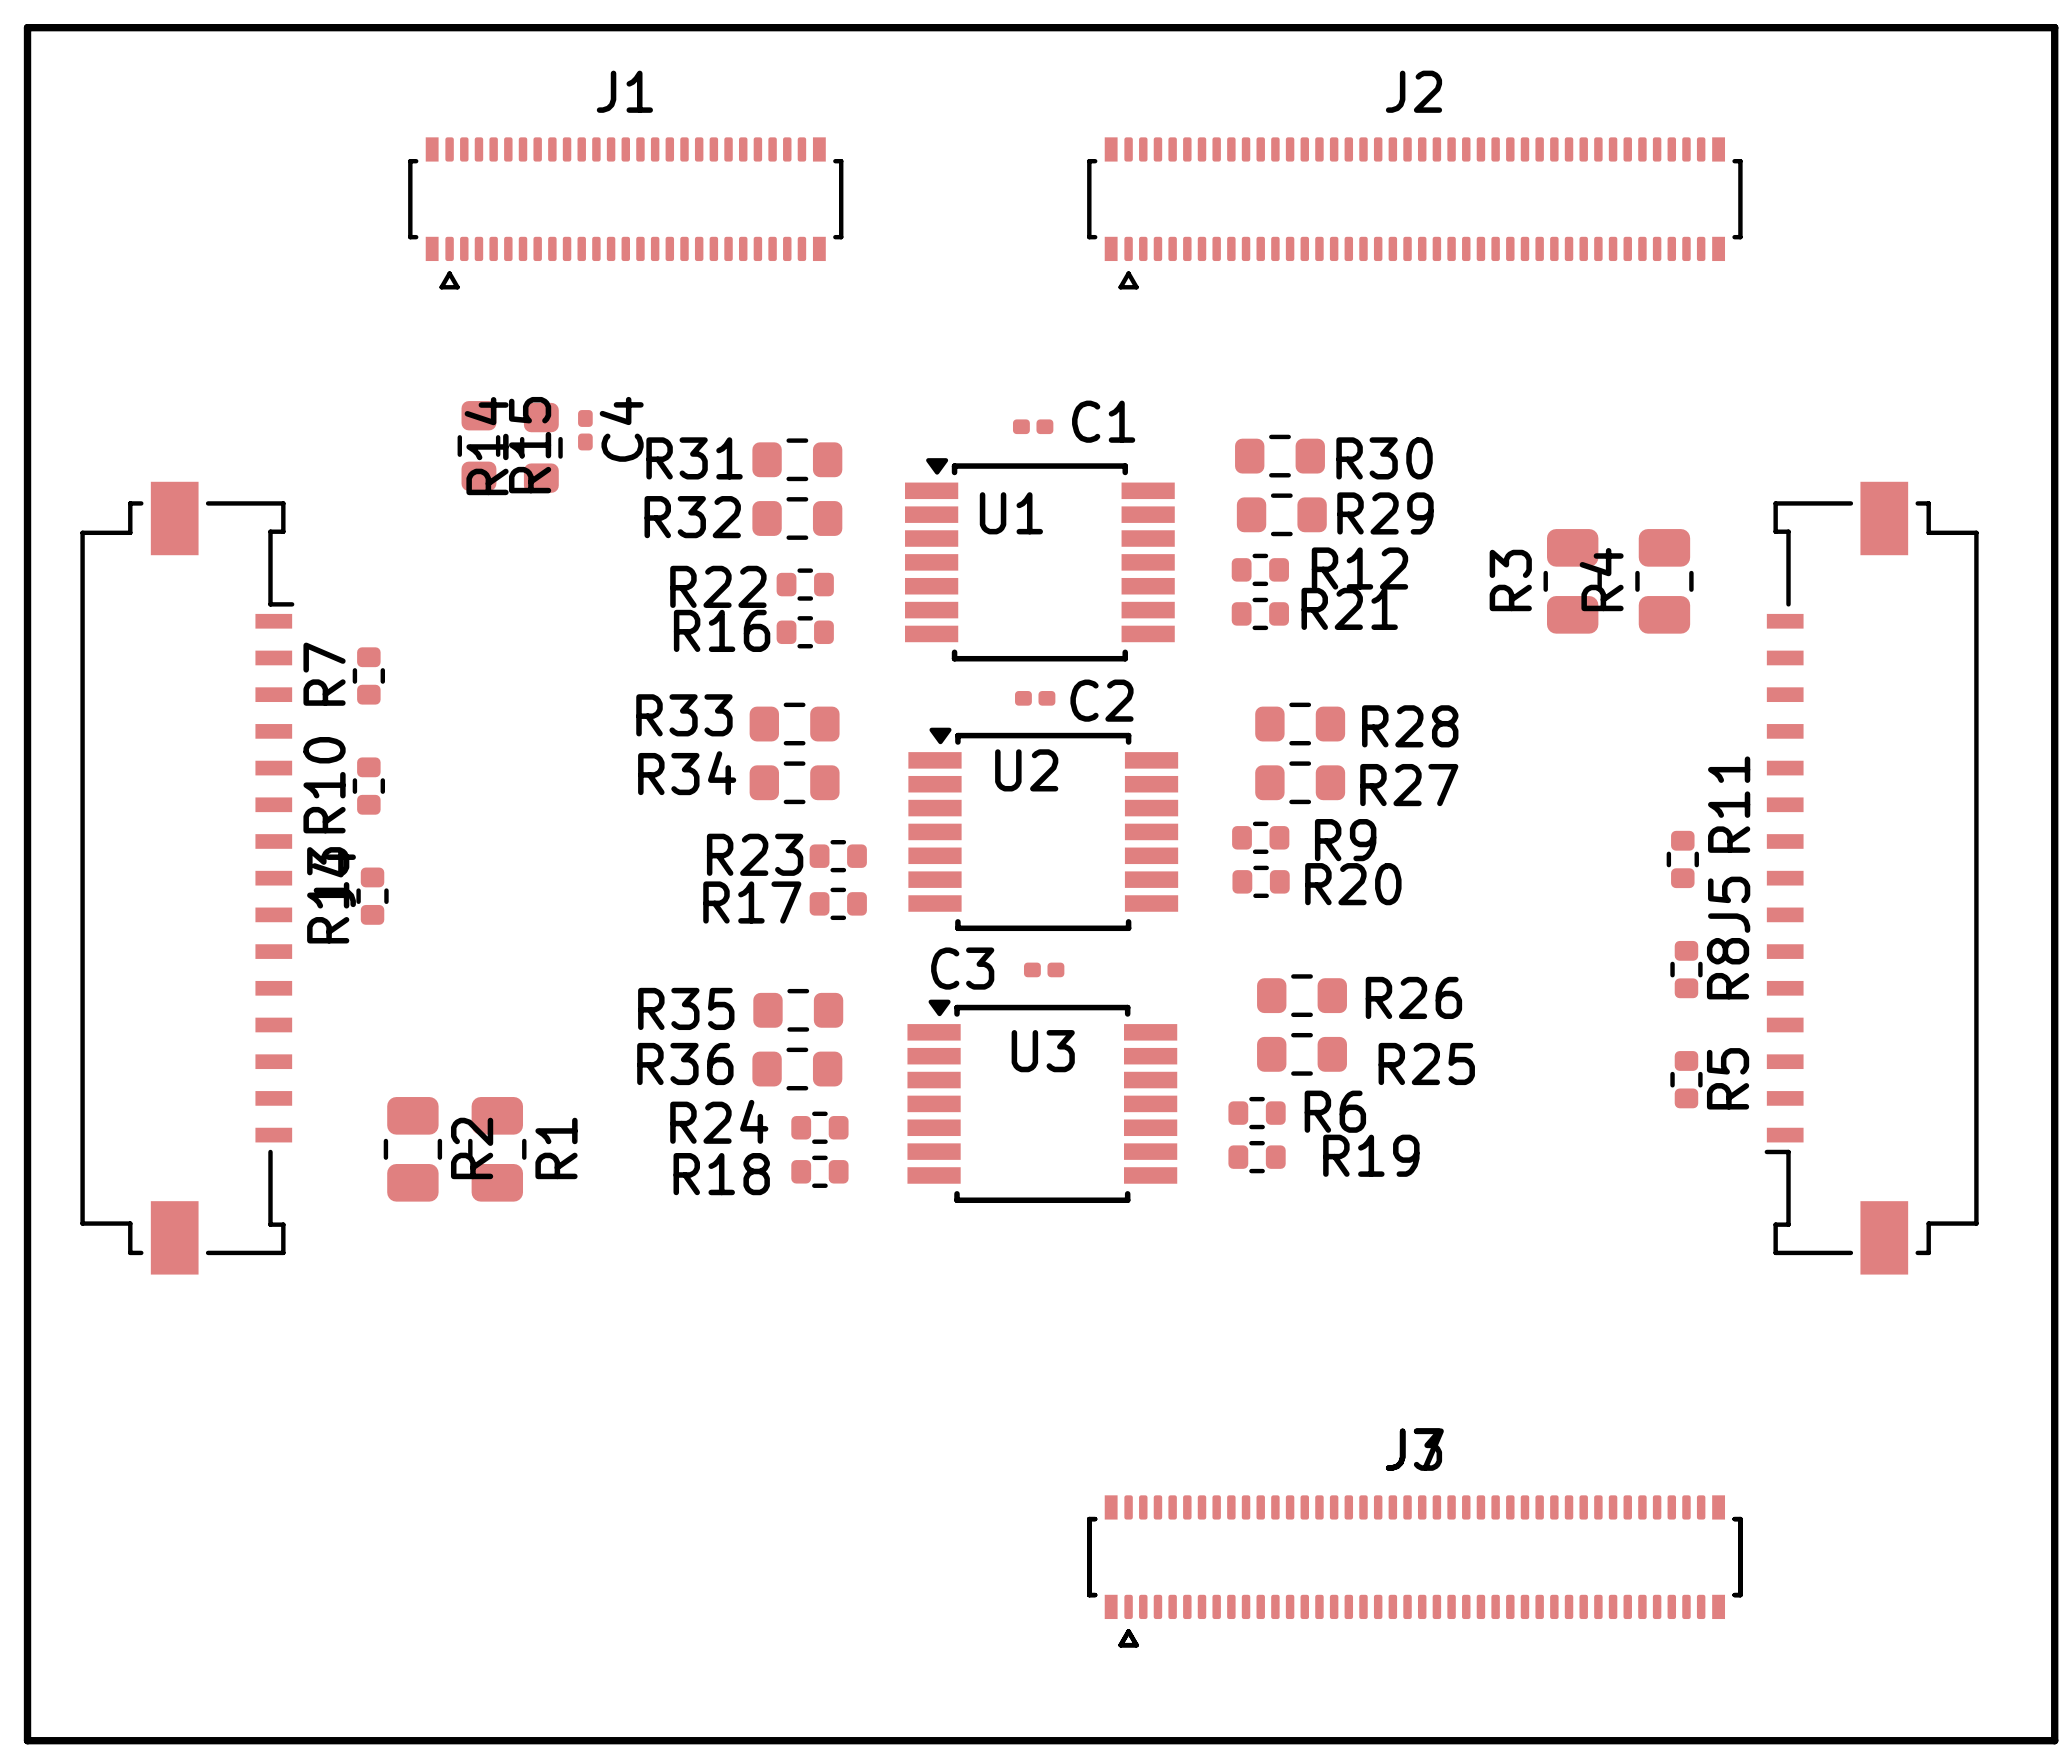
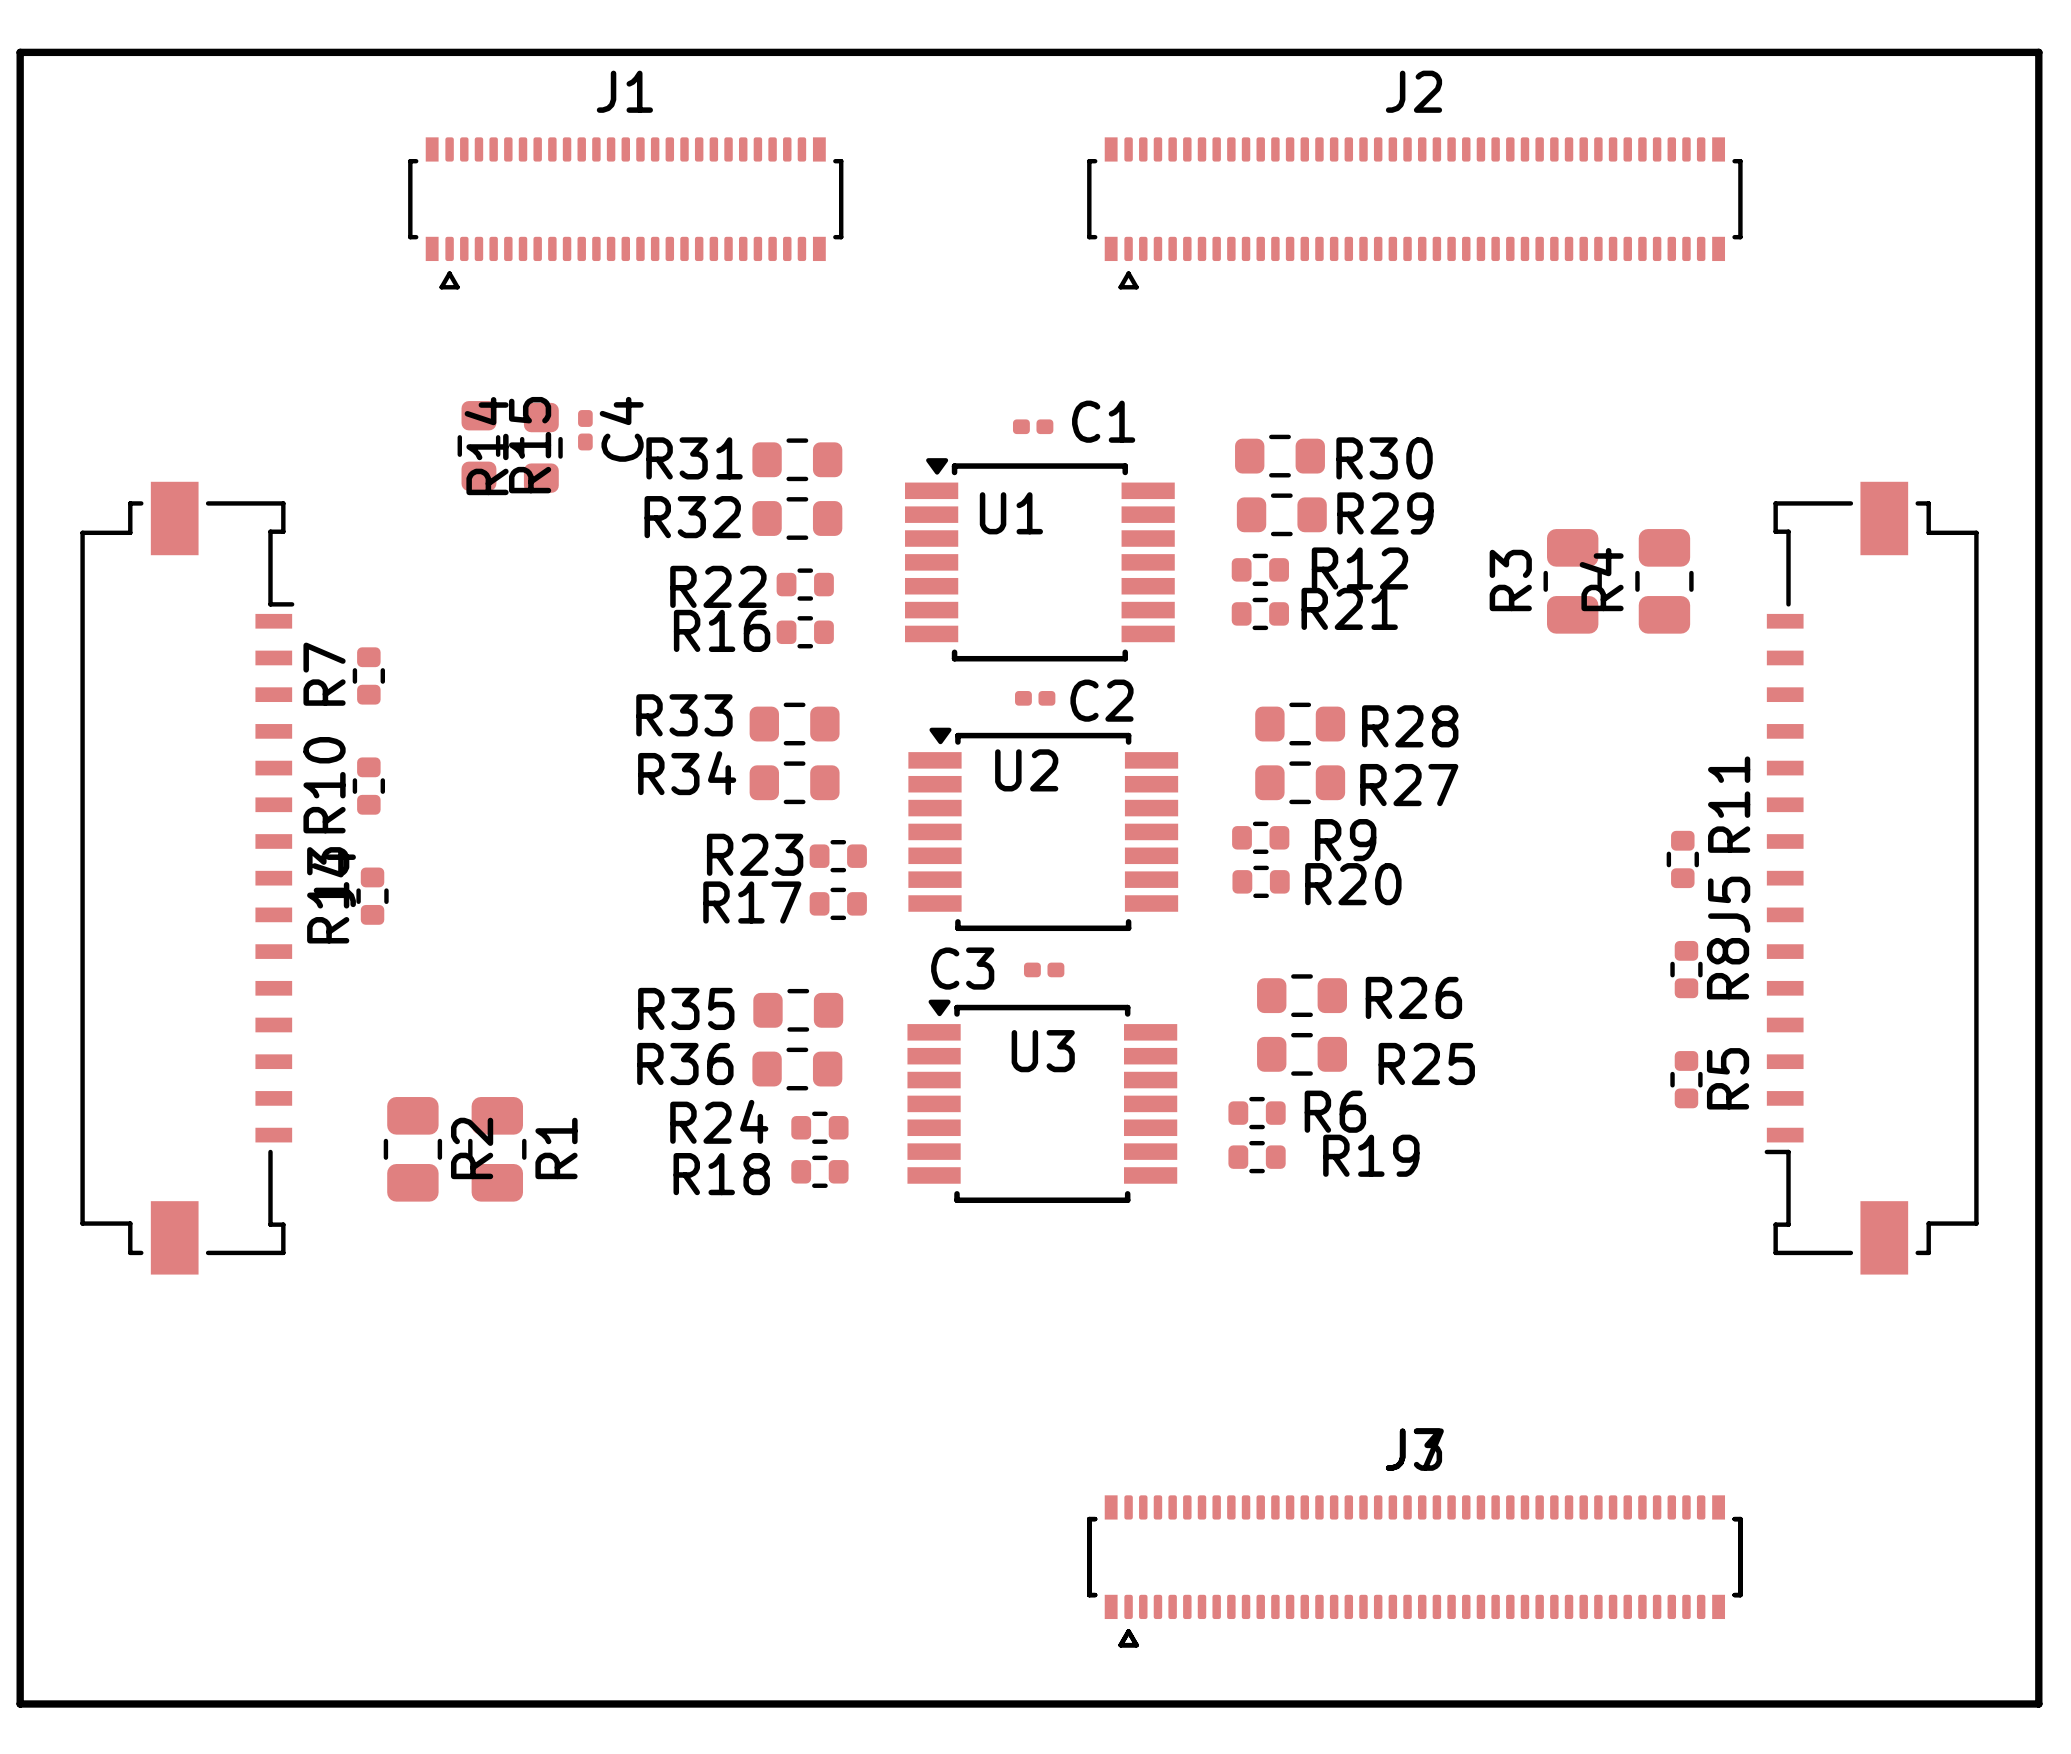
board edge: (27, 27) (2054, 27) (2054, 1740) (27, 1740) (27, 27) -> (20, 52) (20, 1703) (2038, 1703) (2038, 52) (20, 52)

